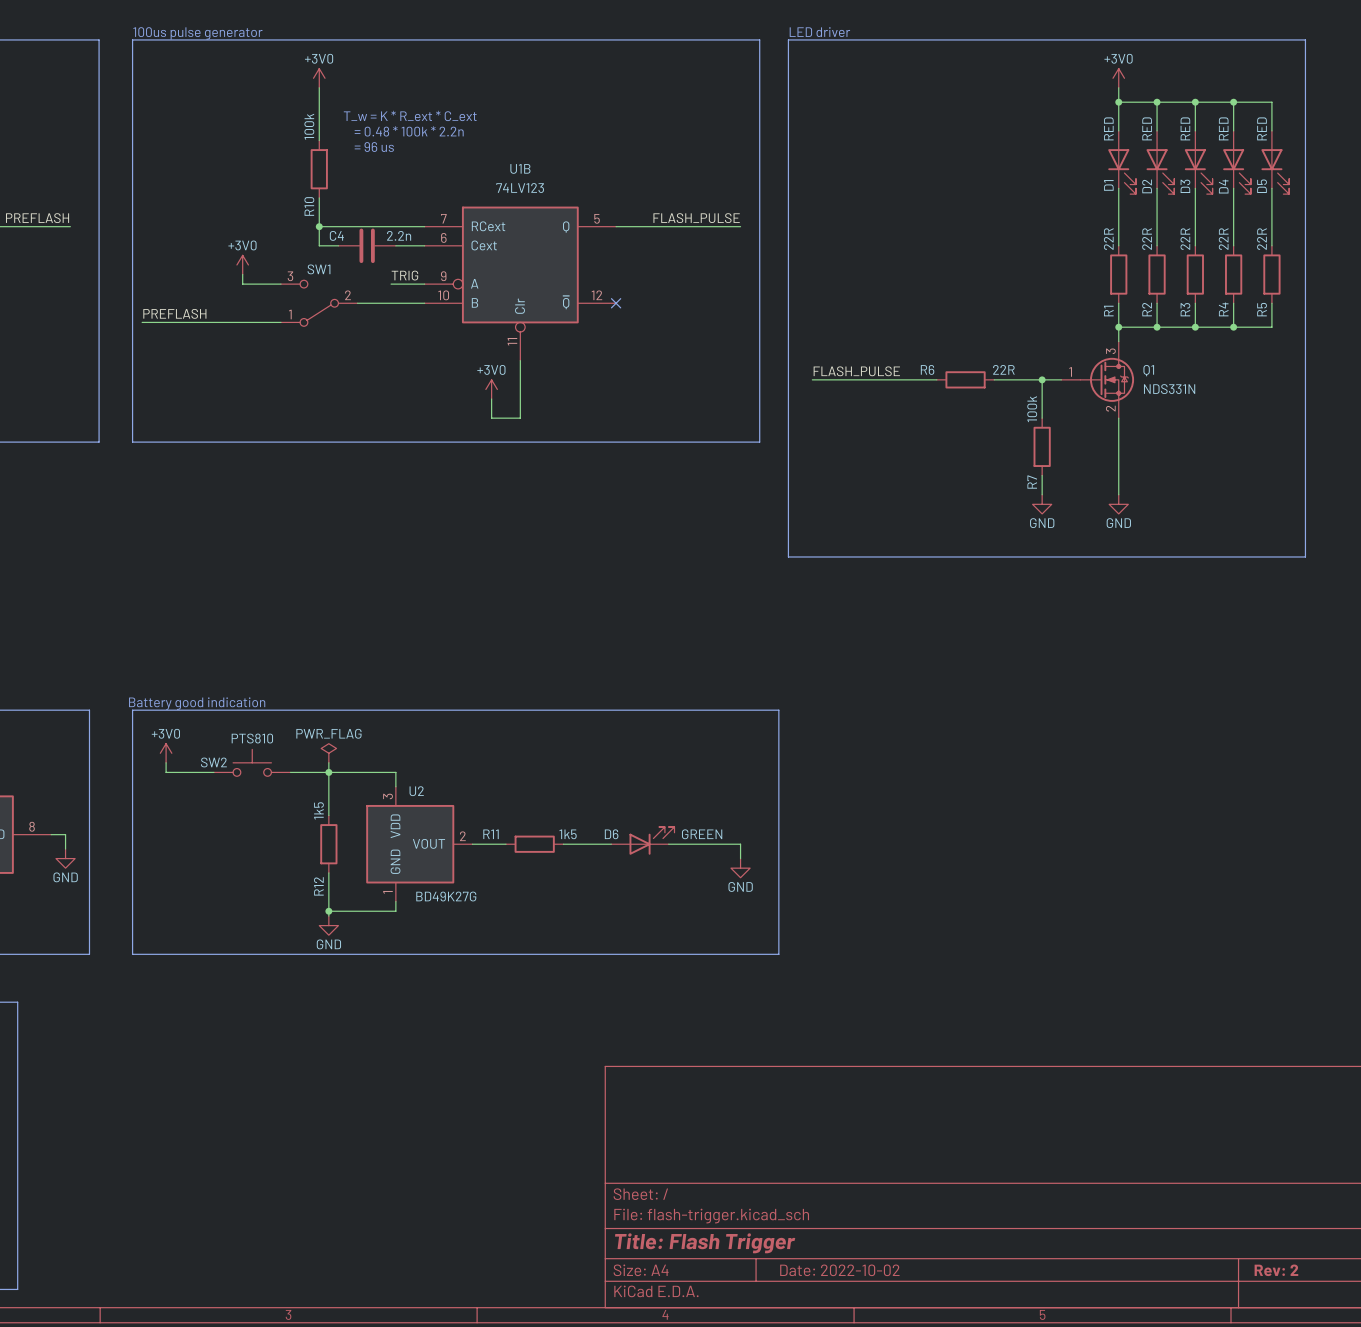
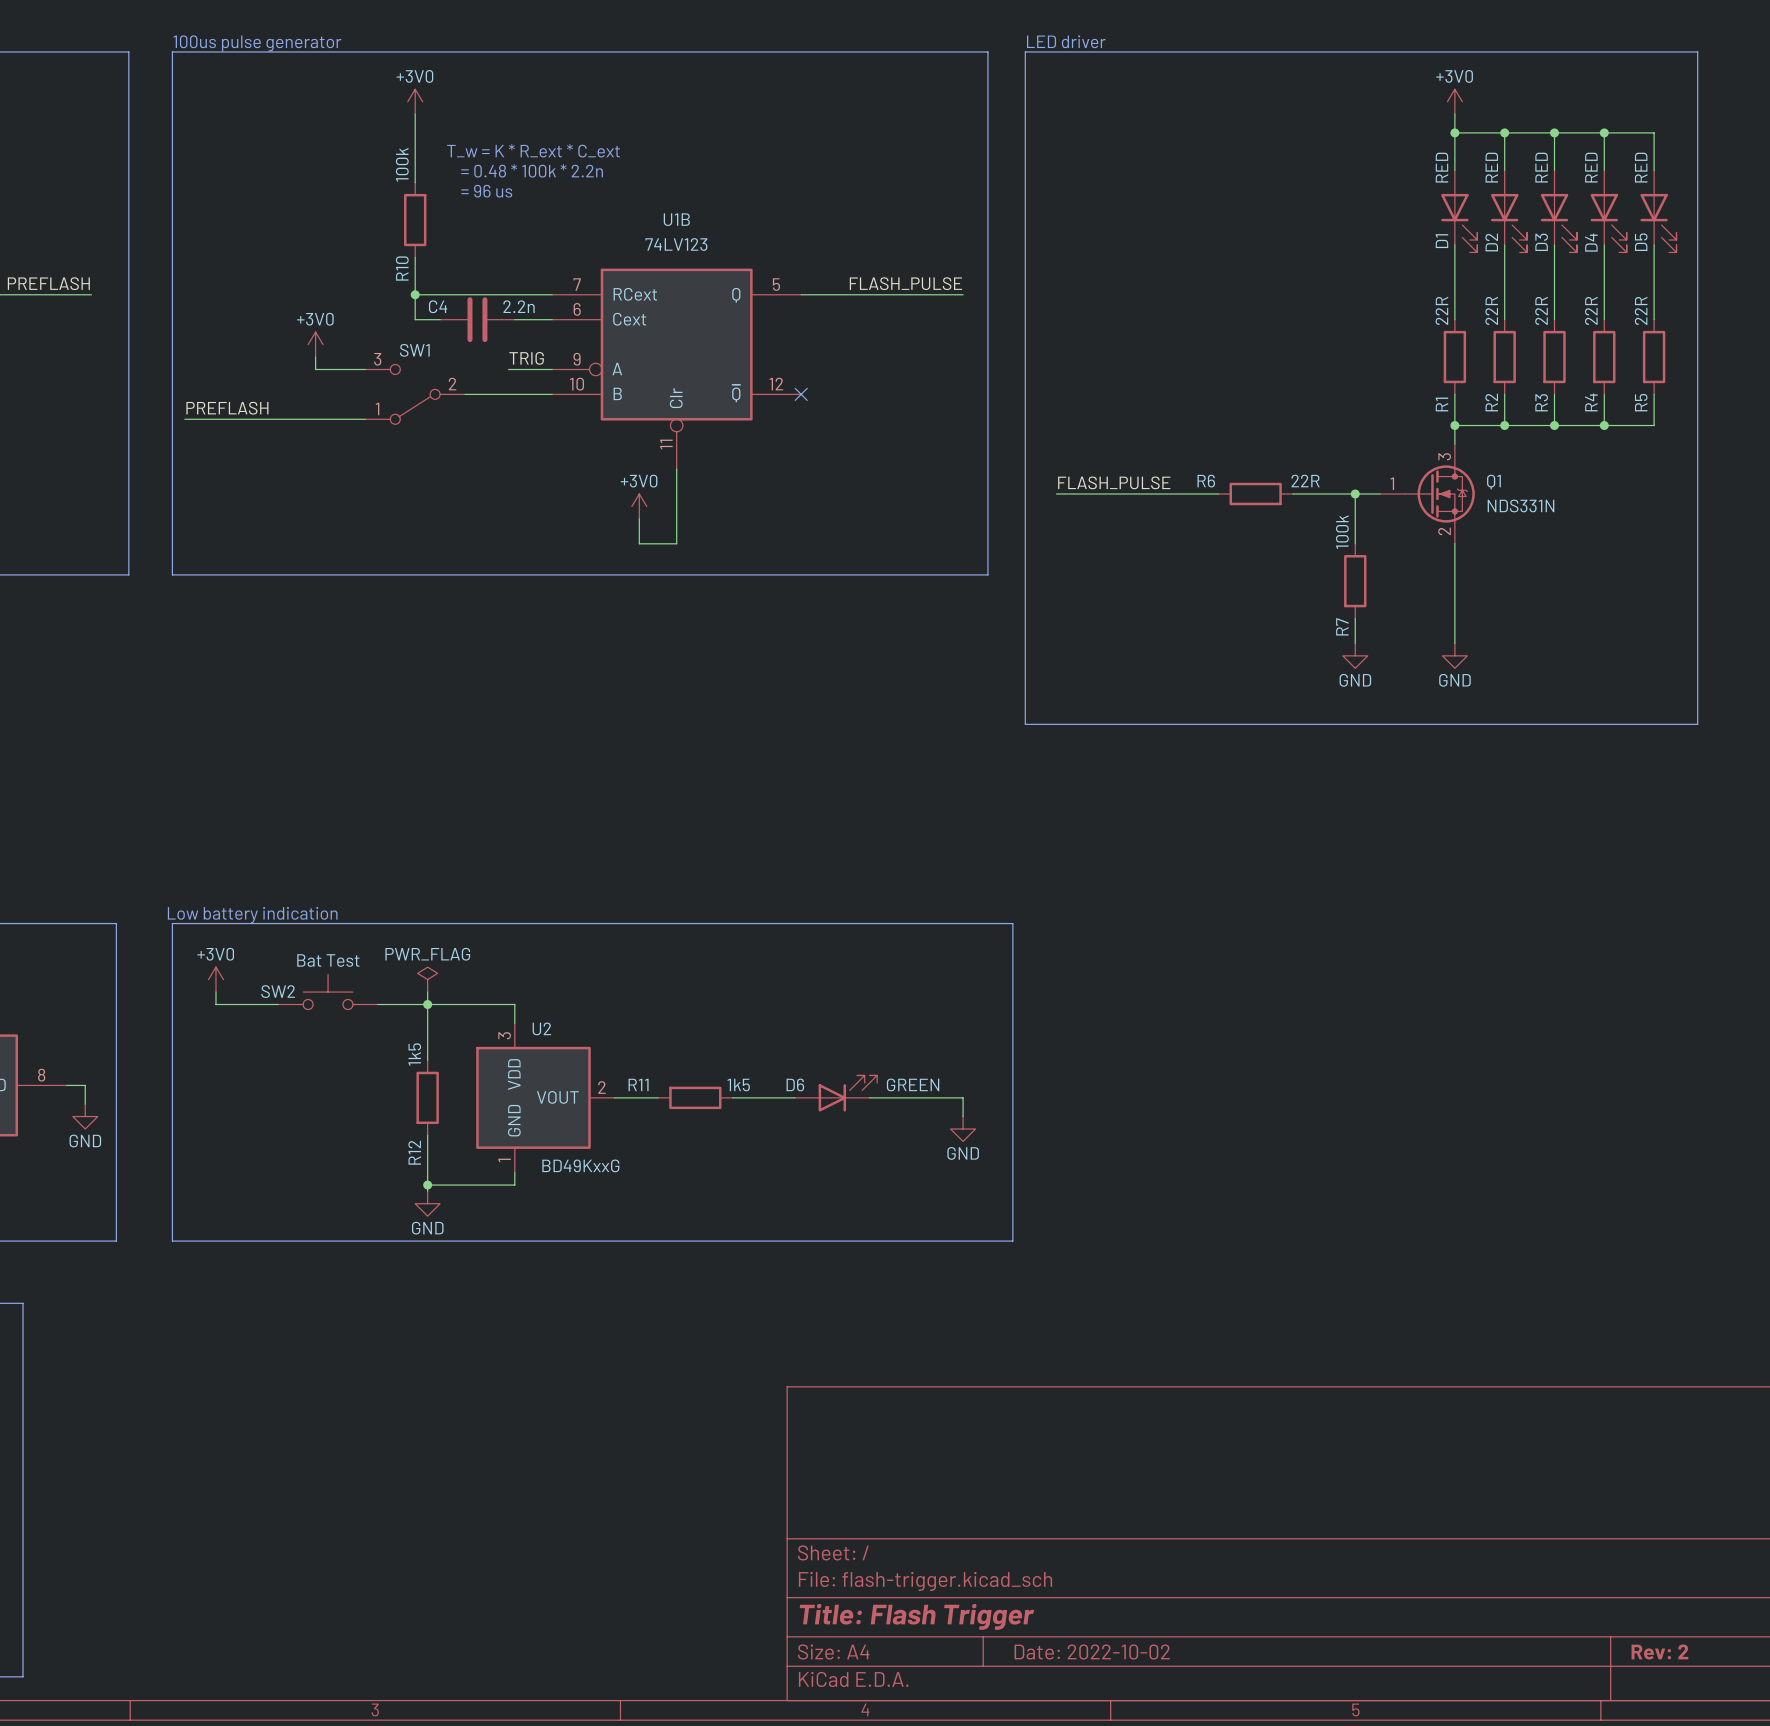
text: Battery good indication (197, 703) -> Low battery indication (252, 915)
SW2 value: PTS810 (252, 738) -> Bat Test (328, 960)
U2 value: BD49K27G (446, 896) -> BD49KxxG (580, 1165)

